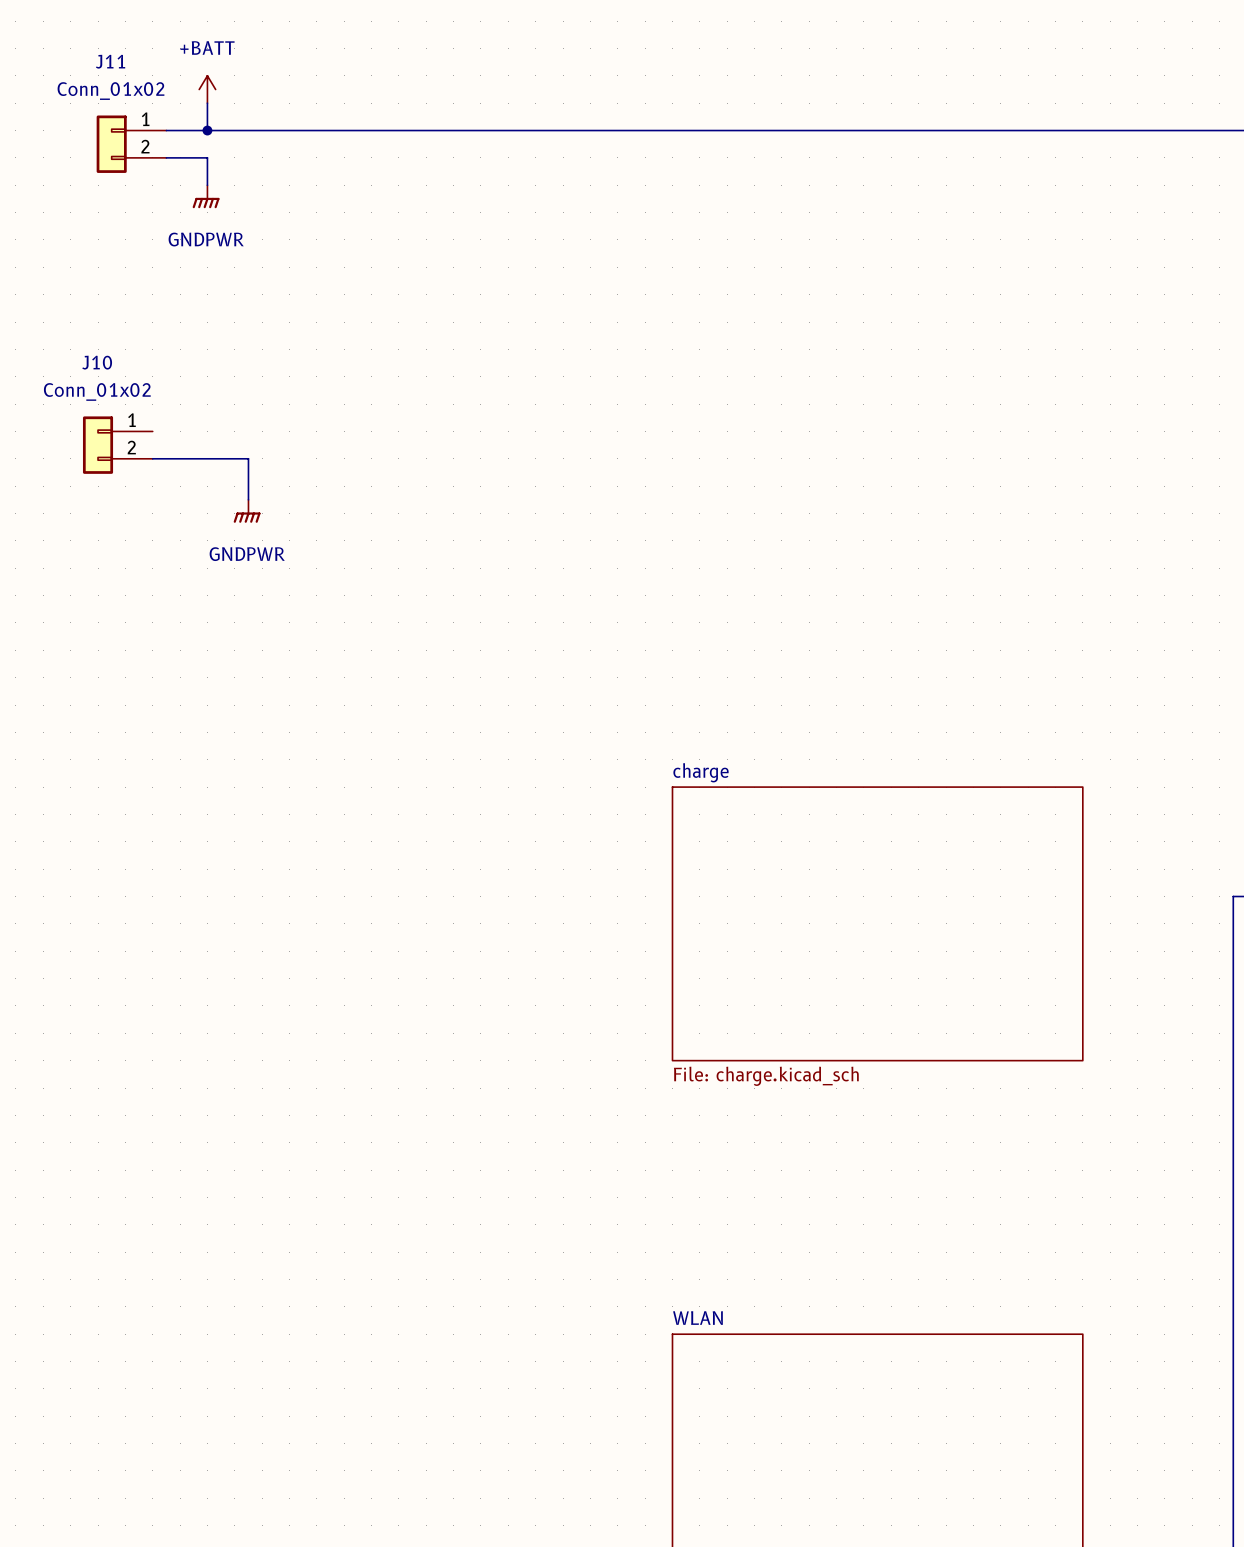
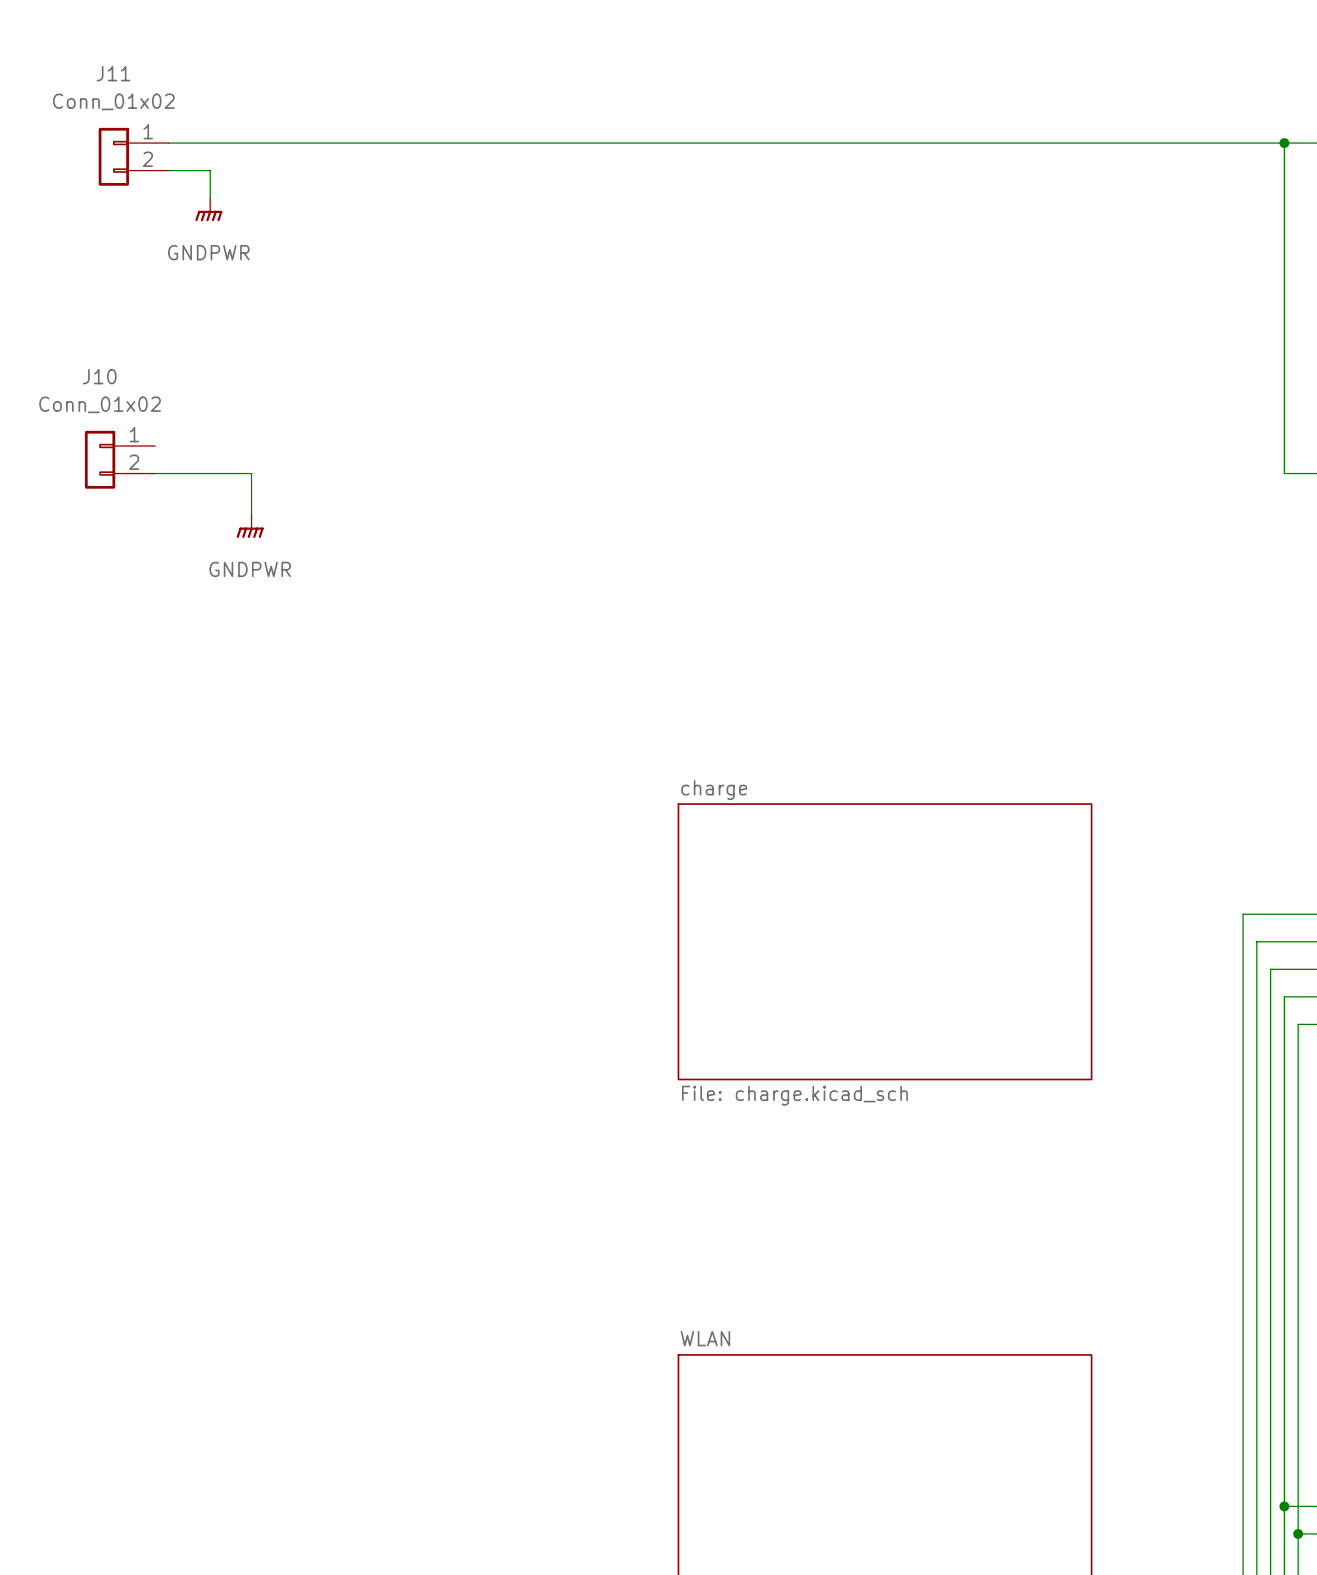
power symbol: +BATT (207, 89) -> none
wire: (207, 103) (207, 130) -> none
junction: (207, 130) -> none

